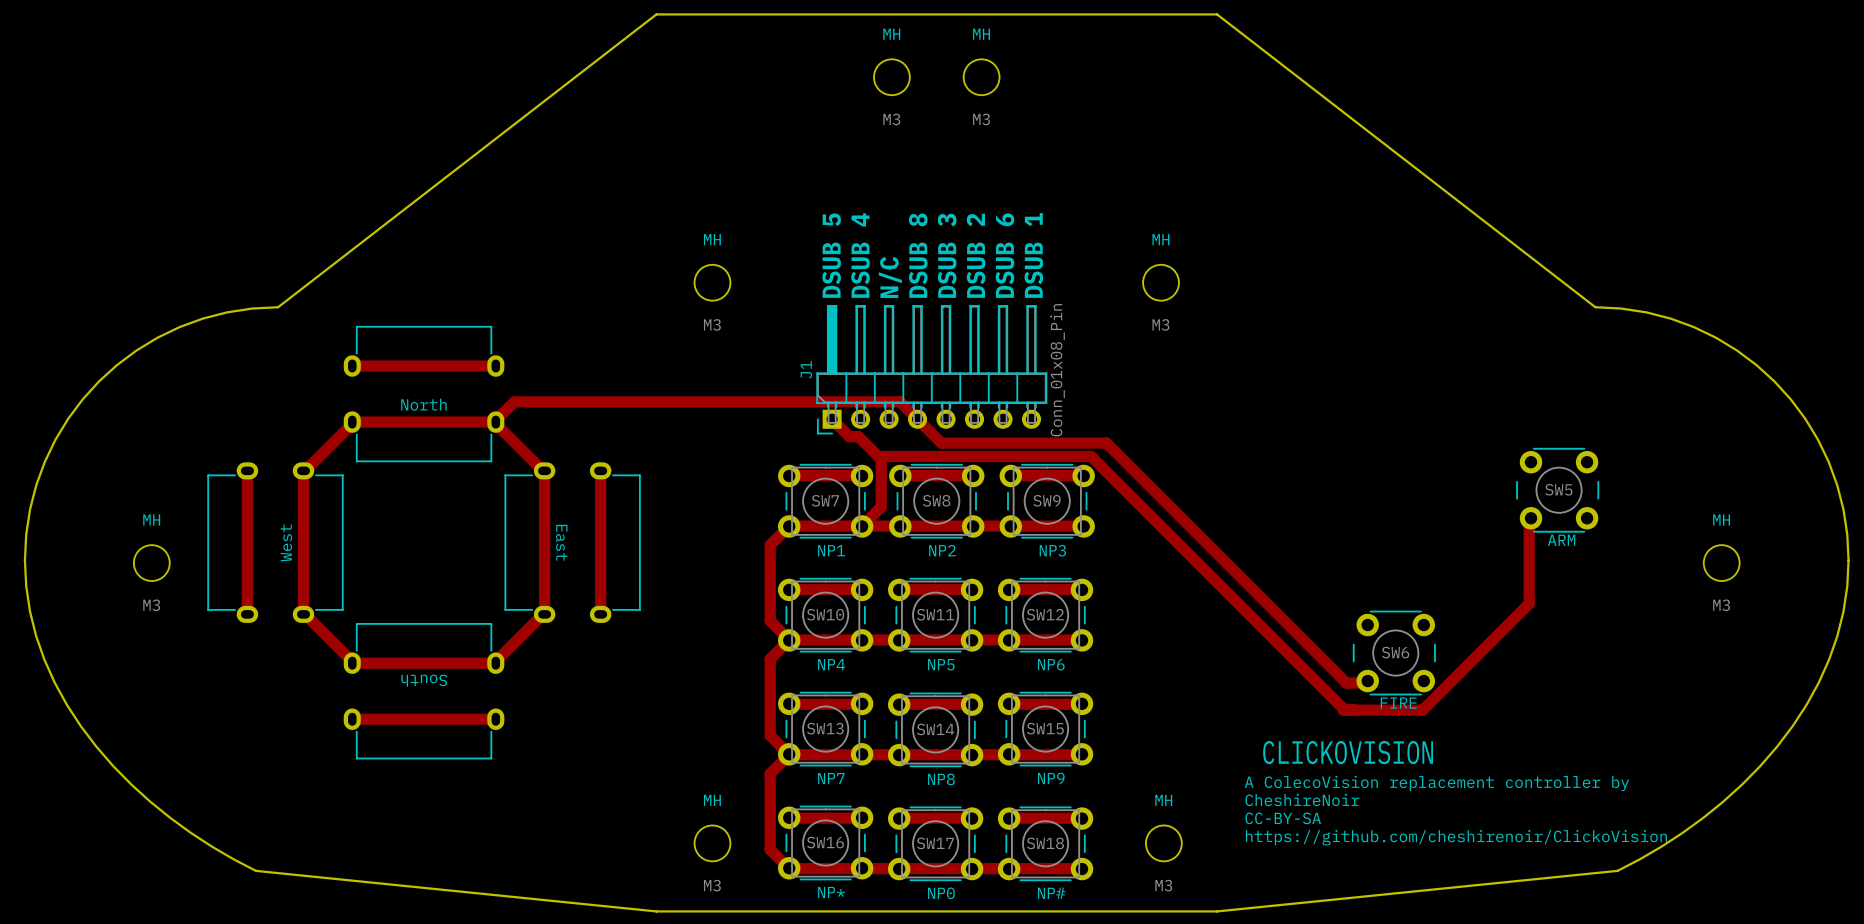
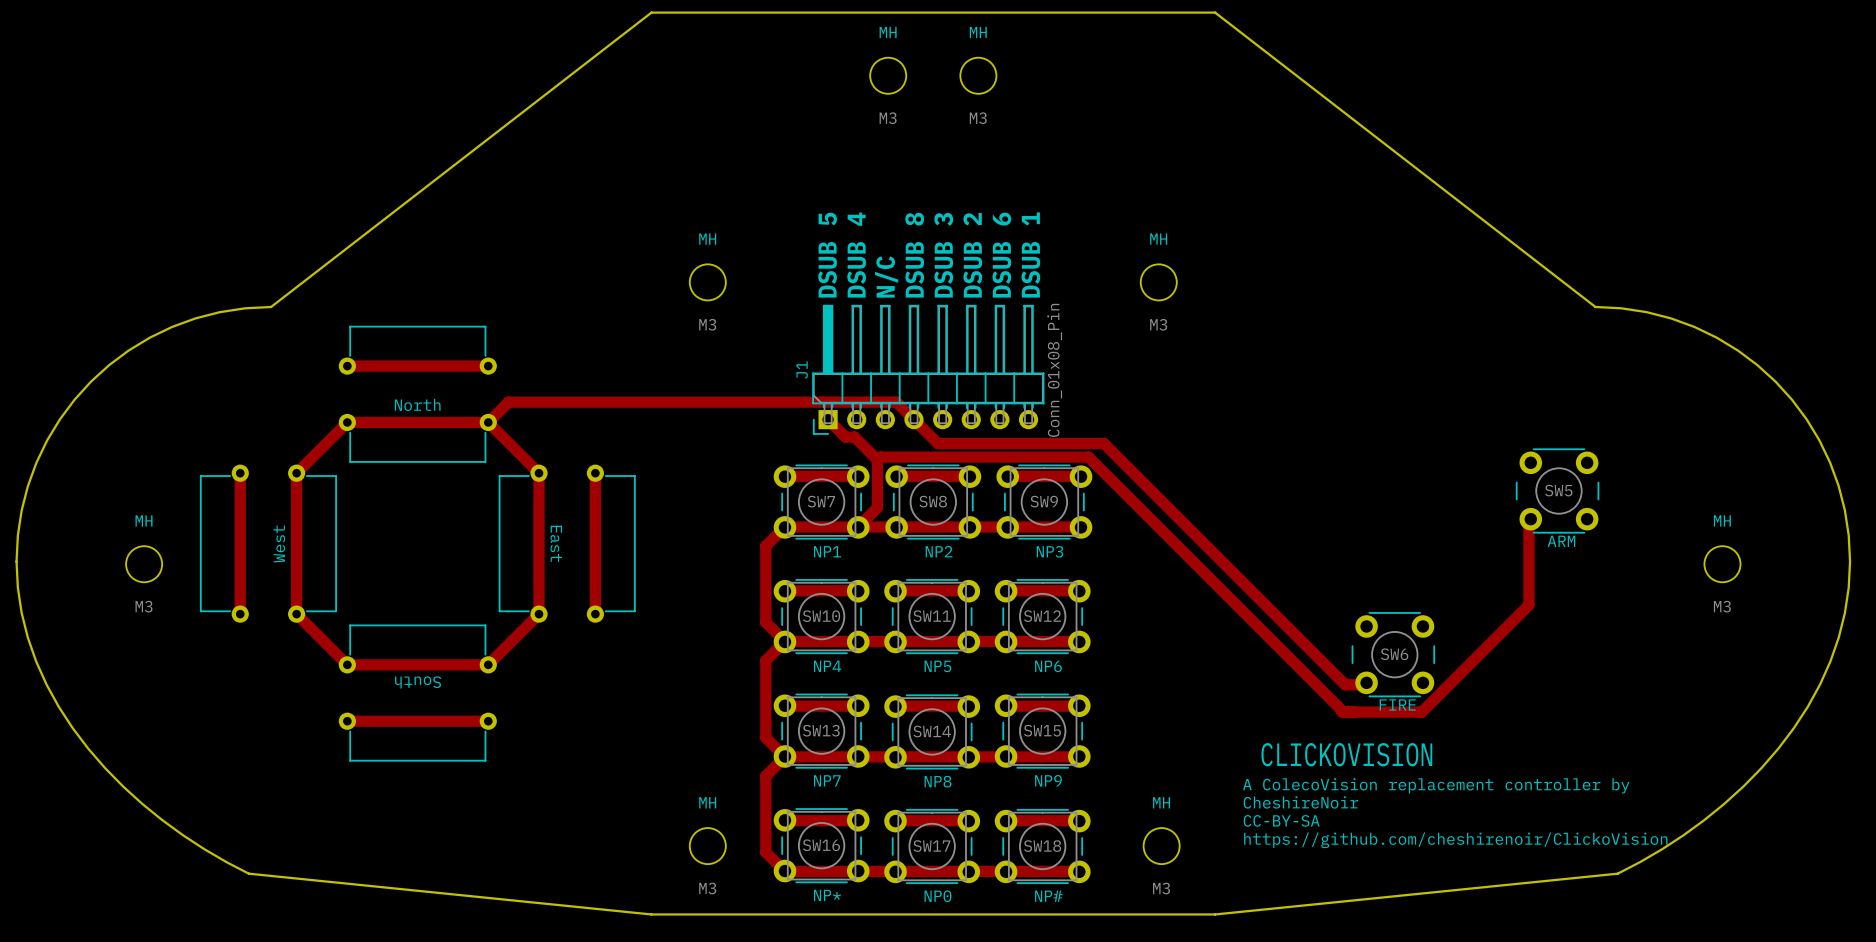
part footprint: [343, 326, 505, 463] -> [338, 325, 497, 463]
part footprint: [207, 462, 344, 623] -> [200, 464, 337, 623]
part footprint: [504, 462, 641, 623] -> [498, 464, 636, 623]
part footprint: [343, 623, 505, 760] -> [338, 624, 497, 762]

